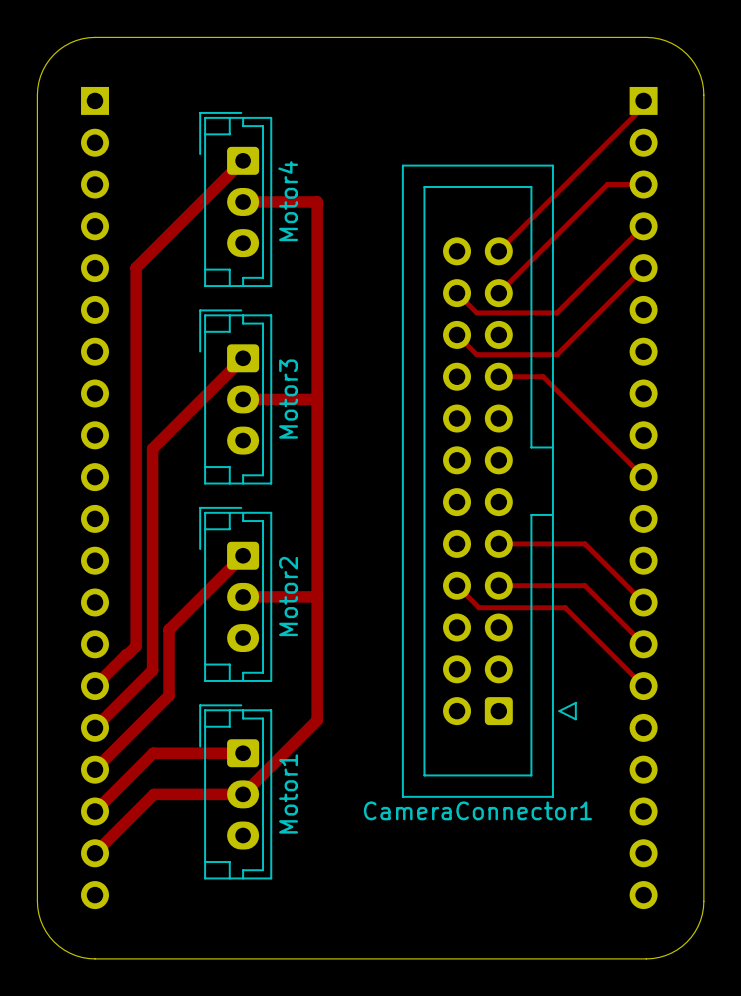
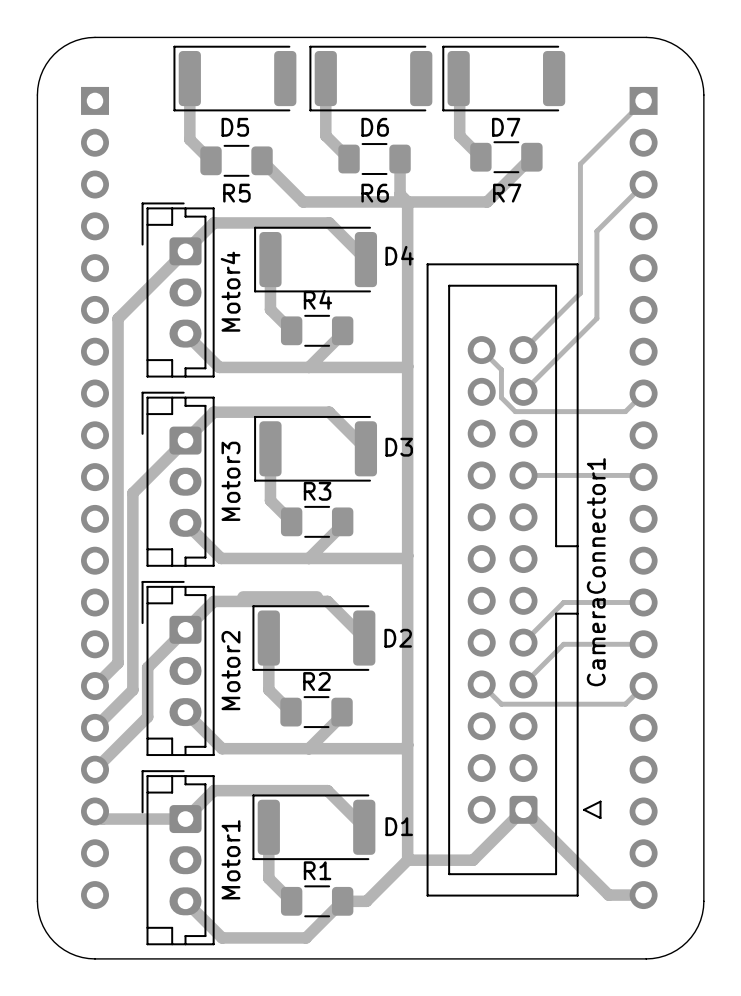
D5: none -> (234, 78)
D6: none -> (370, 78)
D7: none -> (503, 78)
track: none -> (189, 86) (189, 139) (211, 160)
track: none -> (325, 86) (325, 135) (349, 159)
track: none -> (459, 86) (459, 136) (480, 157)
track: (643, 100) (643, 106) (498, 251) -> (643, 100) (580, 164) (580, 293) (523, 350)
R7: none -> (506, 157)
R6: none -> (374, 159)
track: none -> (400, 159) (400, 194) (407, 201) (407, 860)
R5: none -> (236, 160)
track: (243, 160) (136, 267) (136, 646) (118, 663) -> (365, 259) (329, 222) (213, 222) (118, 318) (118, 663)
track: (643, 184) (607, 184) (498, 293) -> (643, 184) (596, 231) (596, 318) (523, 391)
Motor4 position: (235, 199) -> (178, 290)
track: (243, 201) (303, 201) -> (262, 160) (303, 201)
track: (317, 201) (317, 720) (243, 794) (153, 794) (95, 853) -> (317, 201) (487, 201) (531, 157)
track: (643, 226) (557, 312) (476, 312) (457, 293) -> none
track: none -> (270, 259) (270, 309) (291, 330)
D4: none -> (315, 259)
track: (643, 268) (557, 354) (476, 354) (457, 334) -> none
R4: none -> (317, 330)
track: none -> (342, 330) (342, 333) (308, 367)
track: none -> (185, 333) (219, 367) (407, 366)
track: none -> (481, 350) (501, 369) (501, 397) (515, 411) (625, 411) (643, 393)
track: (243, 358) (152, 448) (152, 670) (132, 690) -> (365, 448) (329, 412) (213, 412) (132, 493) (132, 690)
track: (498, 376) (543, 376) (641, 475) -> (523, 475) (641, 475)
Motor3 position: (235, 396) -> (178, 479)
track: (243, 399) (317, 399) -> none
track: none -> (270, 448) (270, 500) (291, 521)
D3: none -> (315, 448)
CameraConnector1 position: (489, 481) -> (514, 579)
R3: none -> (317, 521)
track: none -> (342, 521) (342, 524) (308, 558)
track: none -> (185, 522) (221, 558) (404, 558) (407, 555)
track: (498, 543) (585, 543) (643, 602) -> (523, 642) (563, 602) (643, 602)
track: (243, 555) (169, 629) (169, 695) (147, 717) -> (364, 638) (327, 601) (213, 601) (147, 667) (147, 717)
track: (457, 585) (479, 607) (565, 607) (643, 686) -> (481, 684) (501, 704) (625, 704) (643, 686)
track: (498, 585) (585, 585) (643, 644) -> (523, 684) (563, 644) (643, 644)
Motor2 position: (235, 594) -> (178, 668)
track: none -> (268, 638) (268, 689) (291, 712)
D2: none -> (313, 638)
track: none -> (185, 712) (222, 748) (403, 748) (407, 745)
R2: none -> (316, 712)
track: none -> (342, 712) (342, 715) (308, 748)
track: (243, 753) (153, 753) (95, 811) -> (364, 827) (327, 790) (213, 790) (185, 819) (102, 819) (95, 811)
Motor1 position: (235, 791) -> (178, 857)
CameraConnector1 name rotation: 0° (477, 810) -> 90° counterclockwise (596, 572)
track: none -> (268, 827) (268, 878) (291, 901)
D1: none -> (313, 827)
track: none -> (407, 860) (473, 860) (523, 809) (608, 895) (643, 895)
track: none -> (407, 860) (366, 901) (342, 901) (306, 937) (222, 937) (179, 895)
R1: none -> (317, 901)

